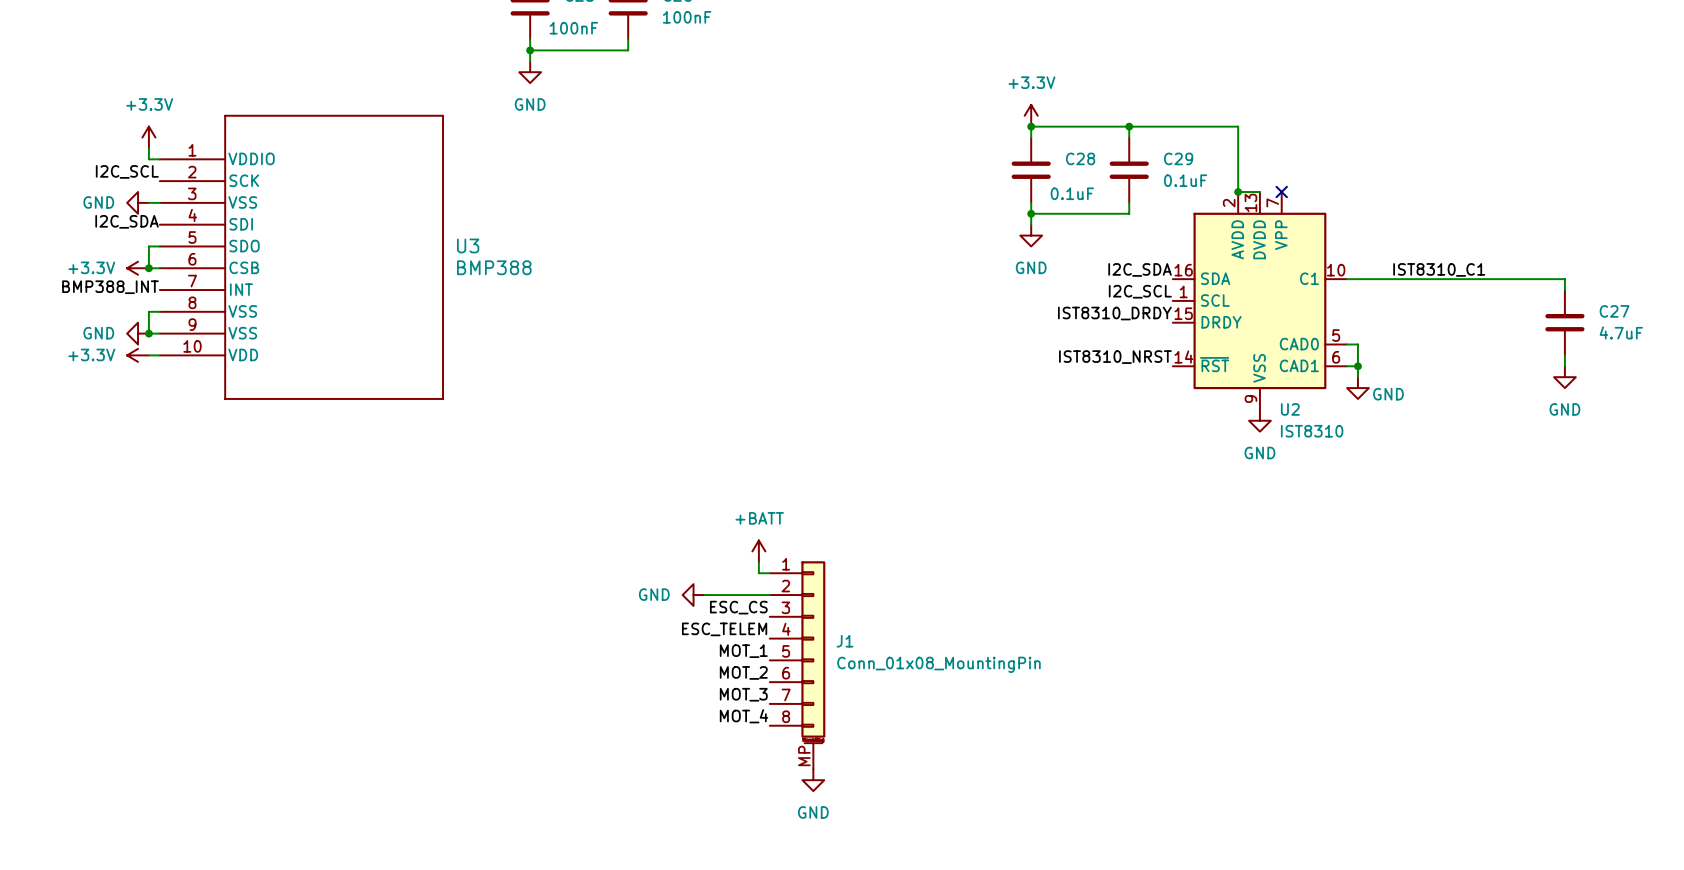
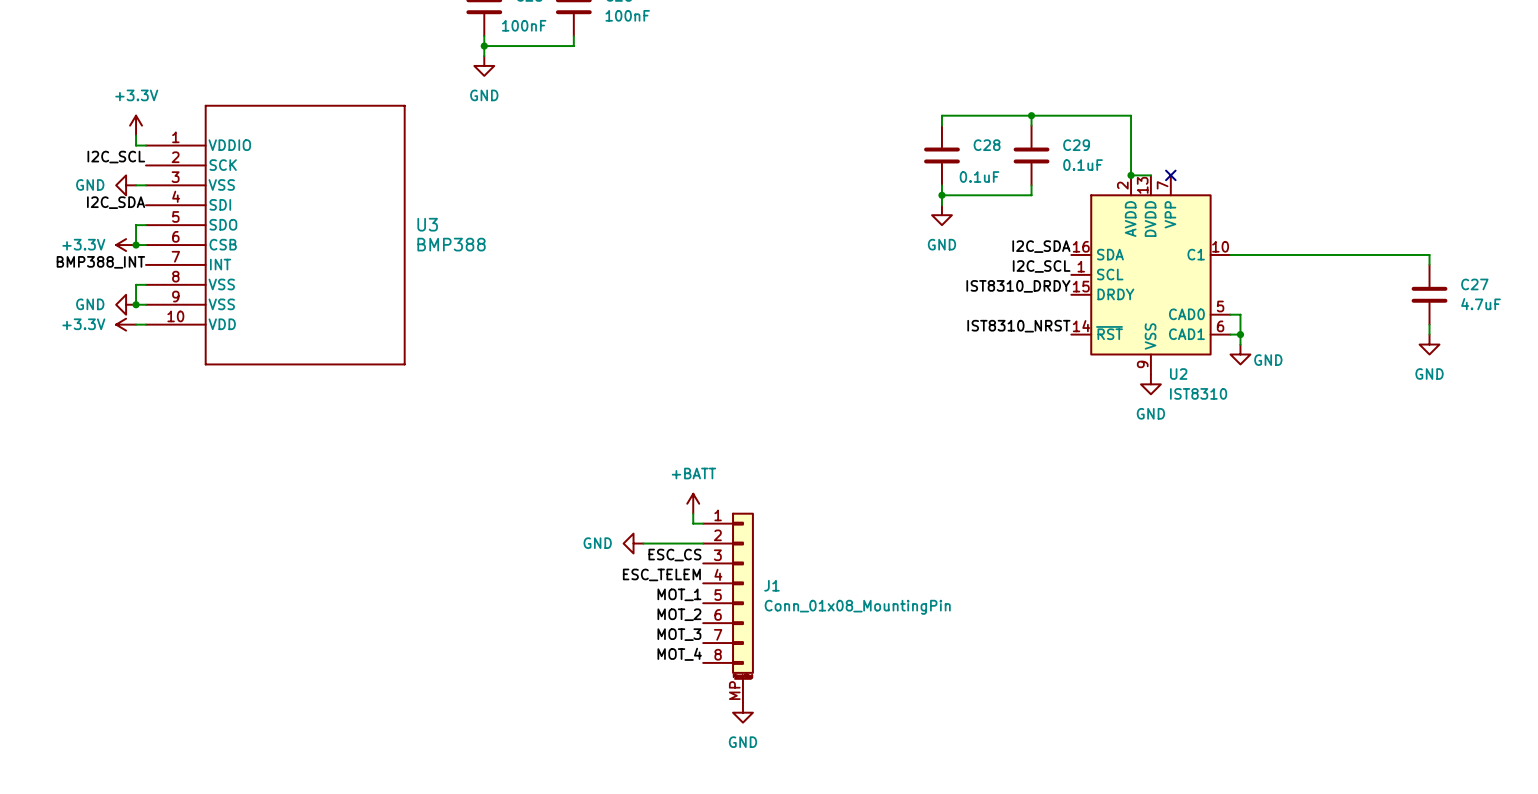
power symbol: +3.3V (1031, 115) -> none
junction: (1031, 126) -> none
label: IST8310_C1 (1439, 269) -> none

